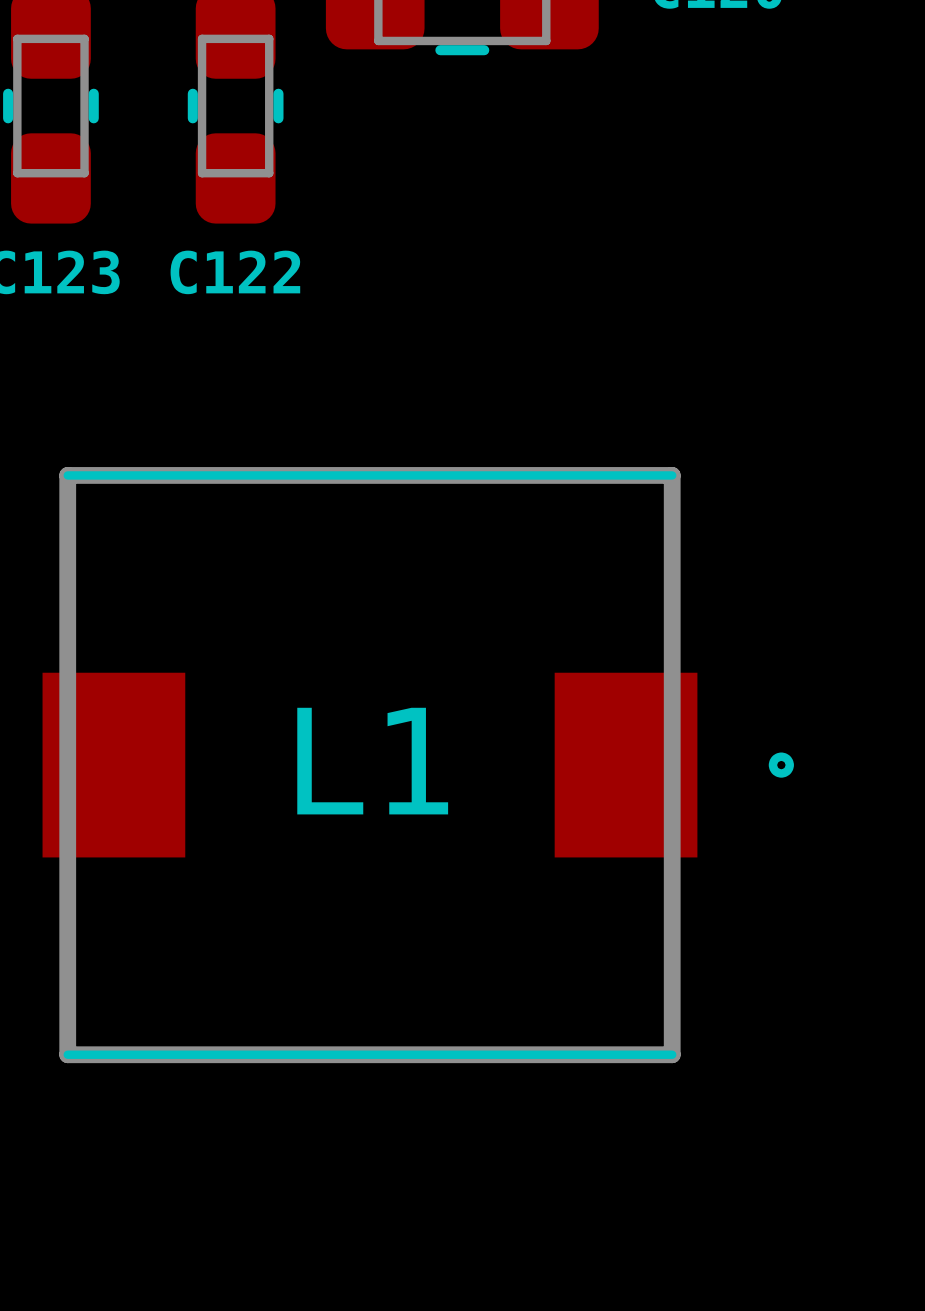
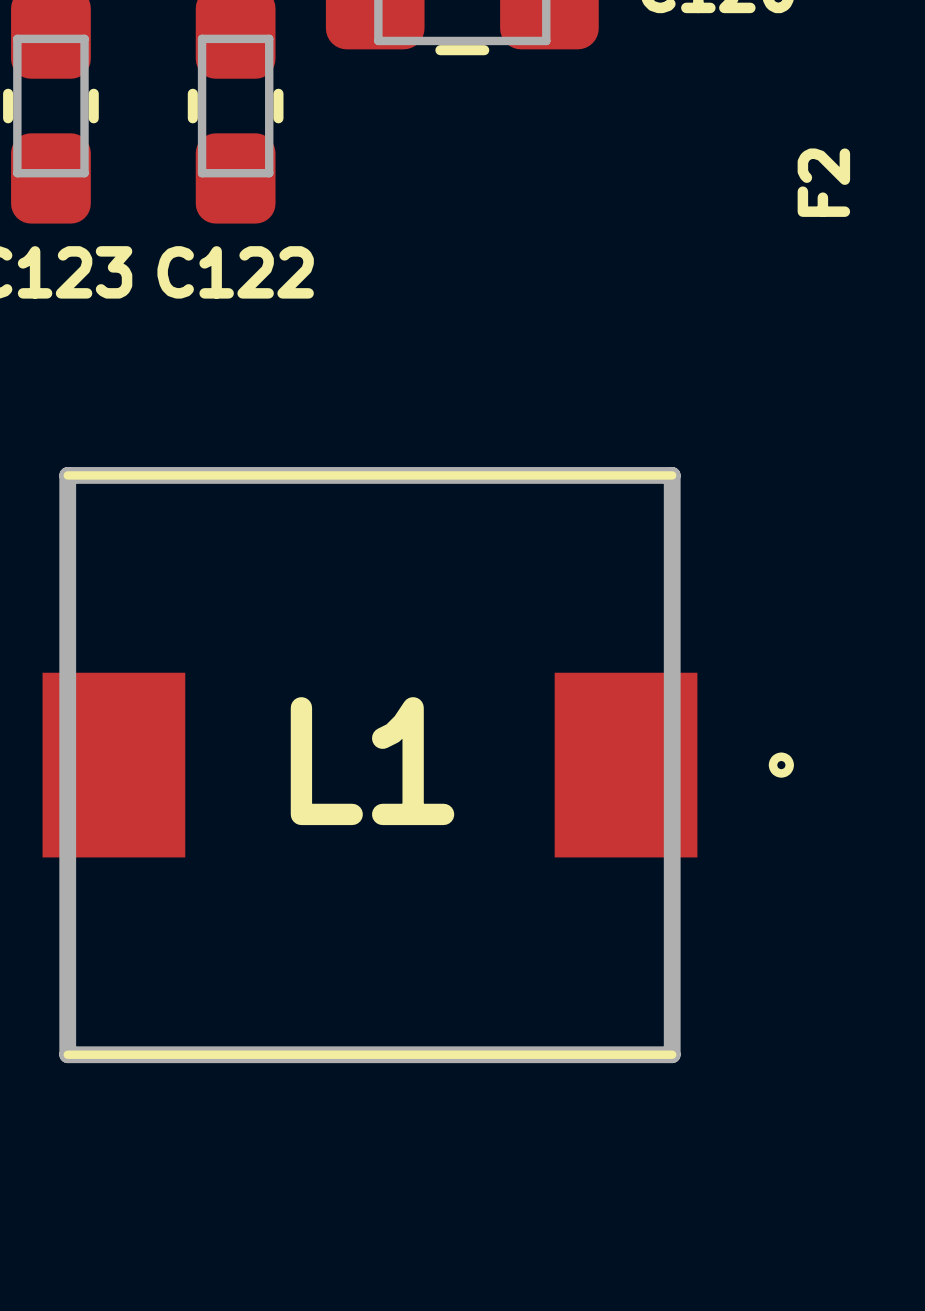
text: none -> F2 (823, 182)

